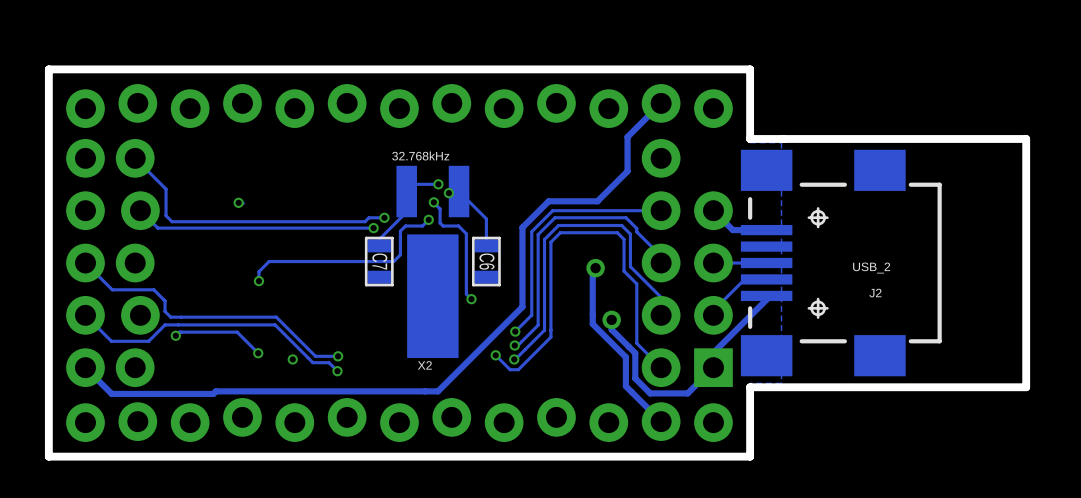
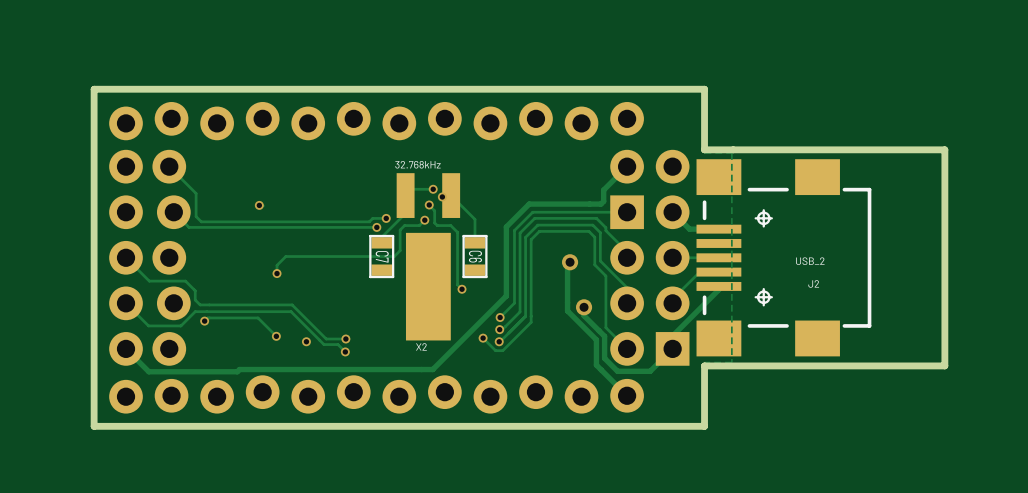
track: (661, 103) (627, 137) (627, 171) (597, 201) -> (627, 166) (603, 190) (603, 201) (600, 204) (571, 204)
part: none -> (376, 121)
part: (399, 106) -> none
part: none -> (649, 166)
part: (661, 263) -> none
part: none -> (627, 280)
part: (399, 420) -> none

